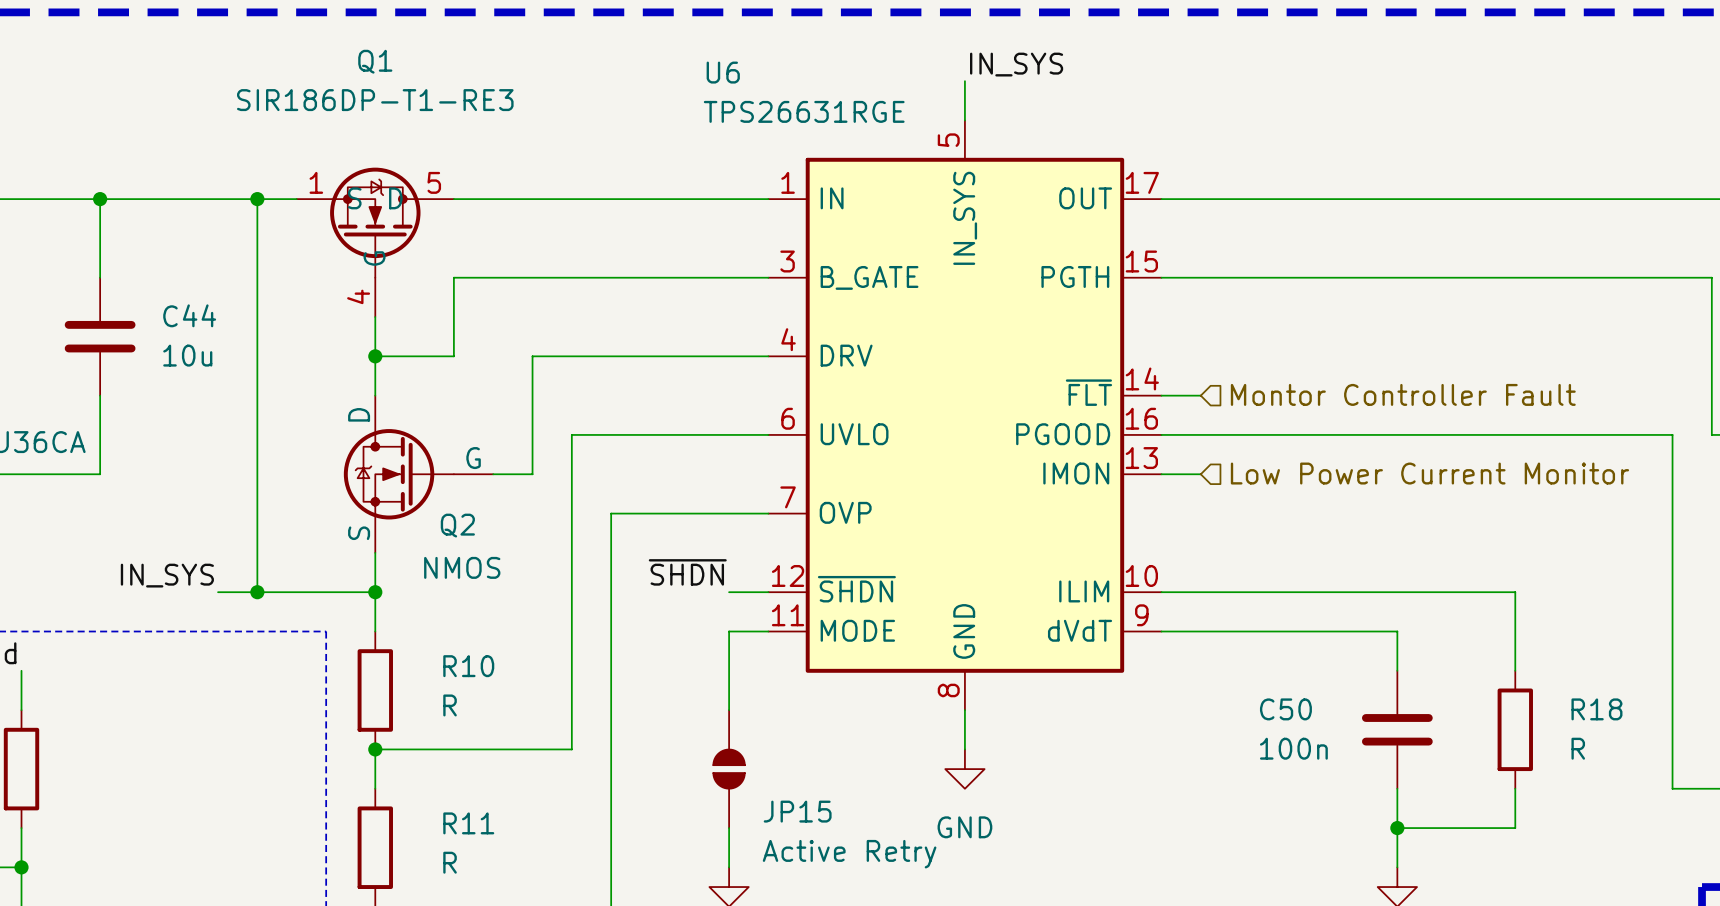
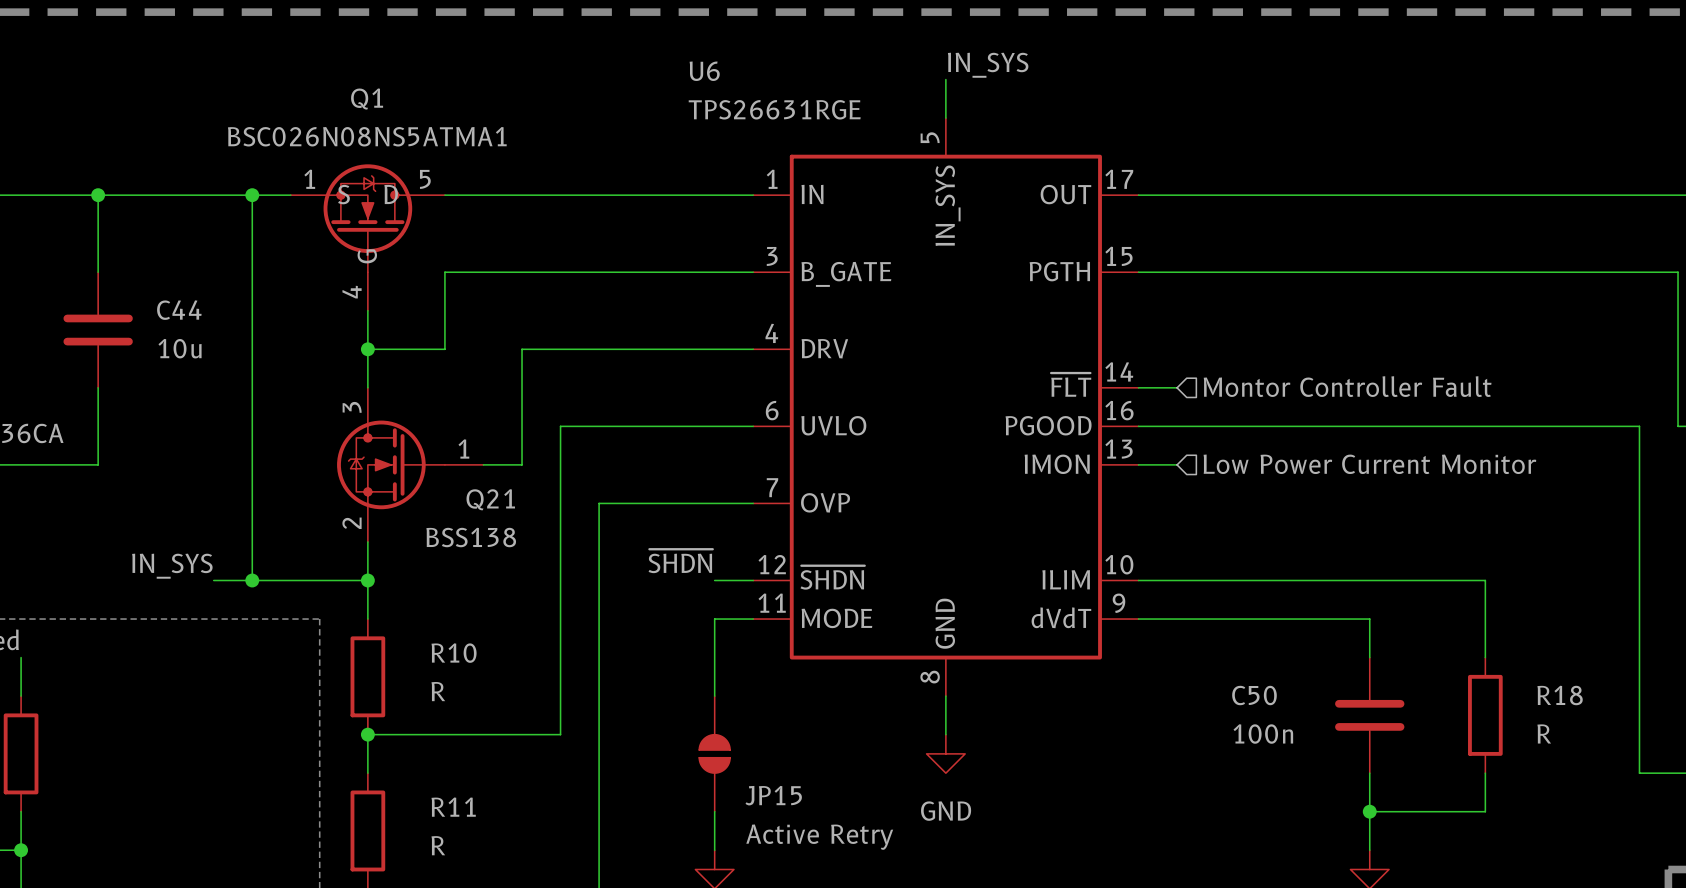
Q1 name position: Q1 (375, 61) -> Q1 (367, 99)
Q1 value: SIR186DP-T1-RE3 (375, 100) -> BSC026N08NS5ATMA1 (367, 136)
Q2 pin name: D (359, 414) -> none
Q2 pin number: none -> 3 (352, 407)
Q2 pin name: G (473, 458) -> none
Q2 pin number: none -> 1 (463, 449)
Q2 name: Q2 (457, 525) -> Q21 (490, 499)
Q2 pin name: S (359, 533) -> none
Q2 pin number: none -> 2 (352, 523)
Q2 value: NMOS (462, 567) -> BSS138 (471, 537)

